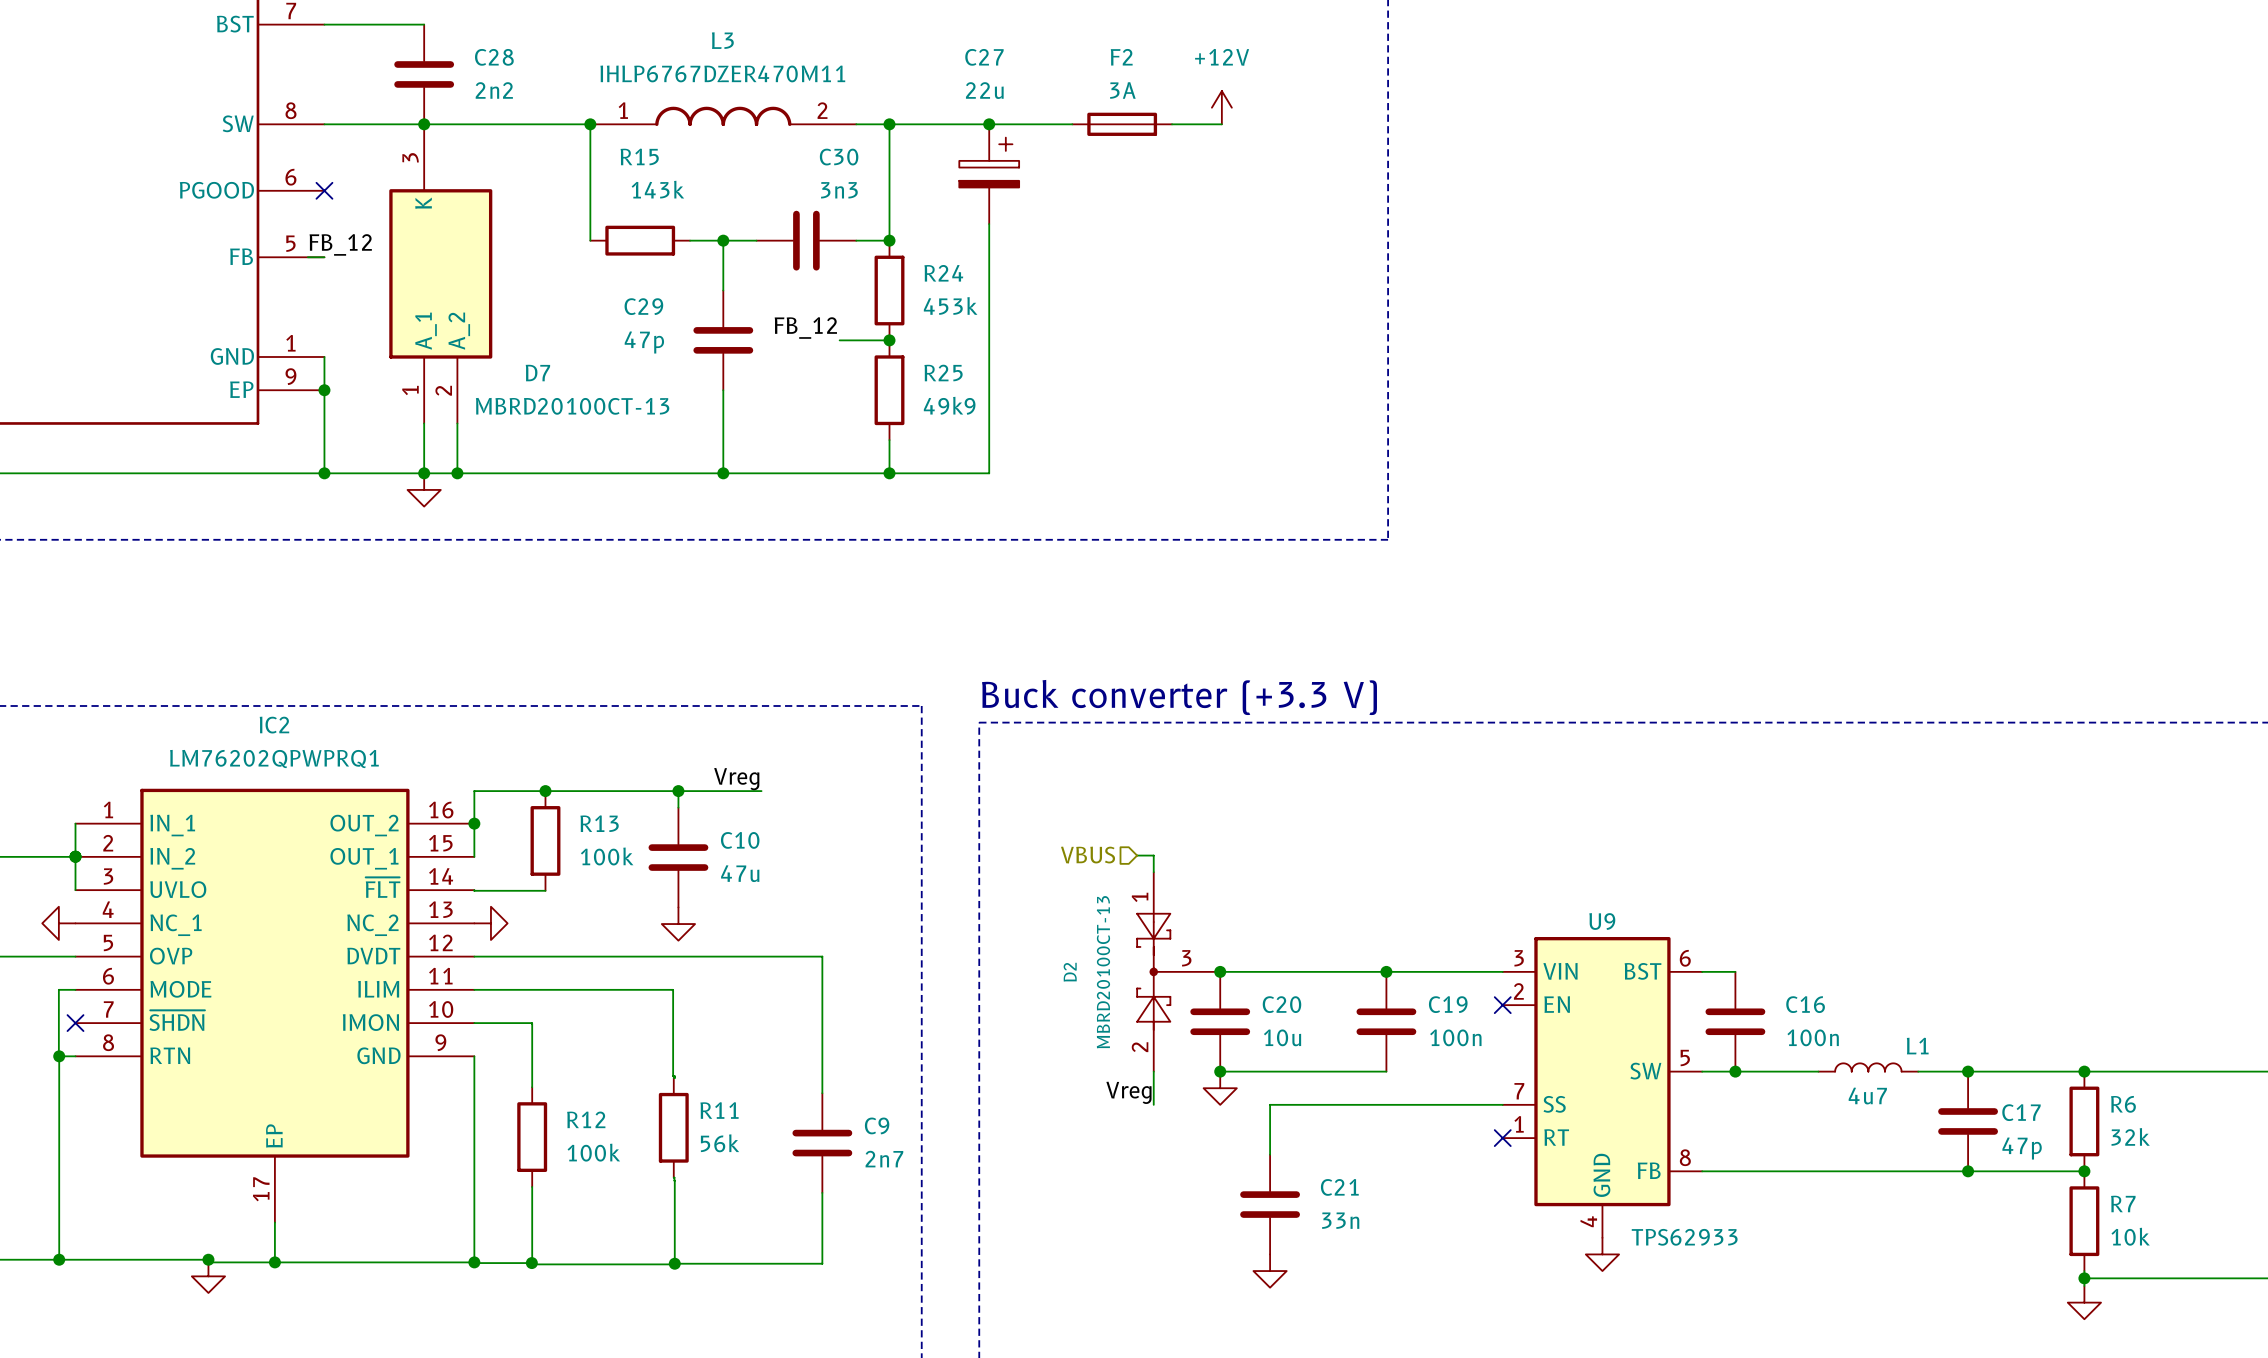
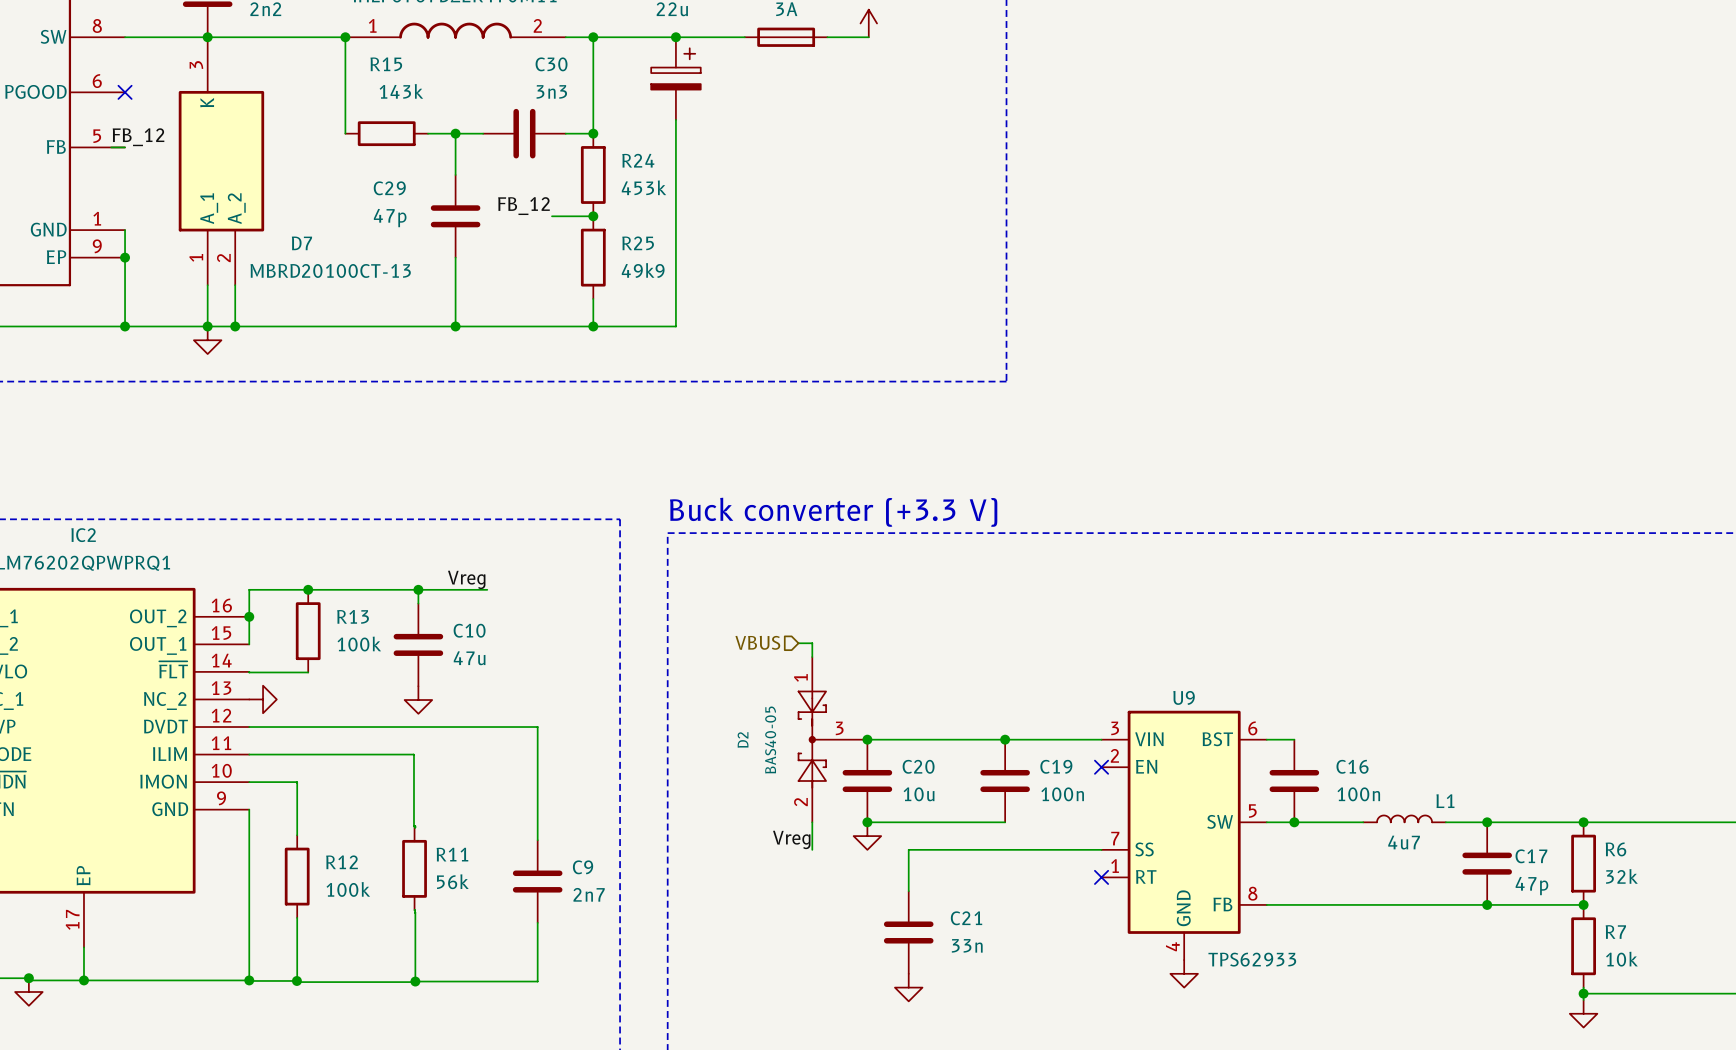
D2 value: MBRD20100CT-13 (1103, 972) -> BAS40-05 (770, 740)

